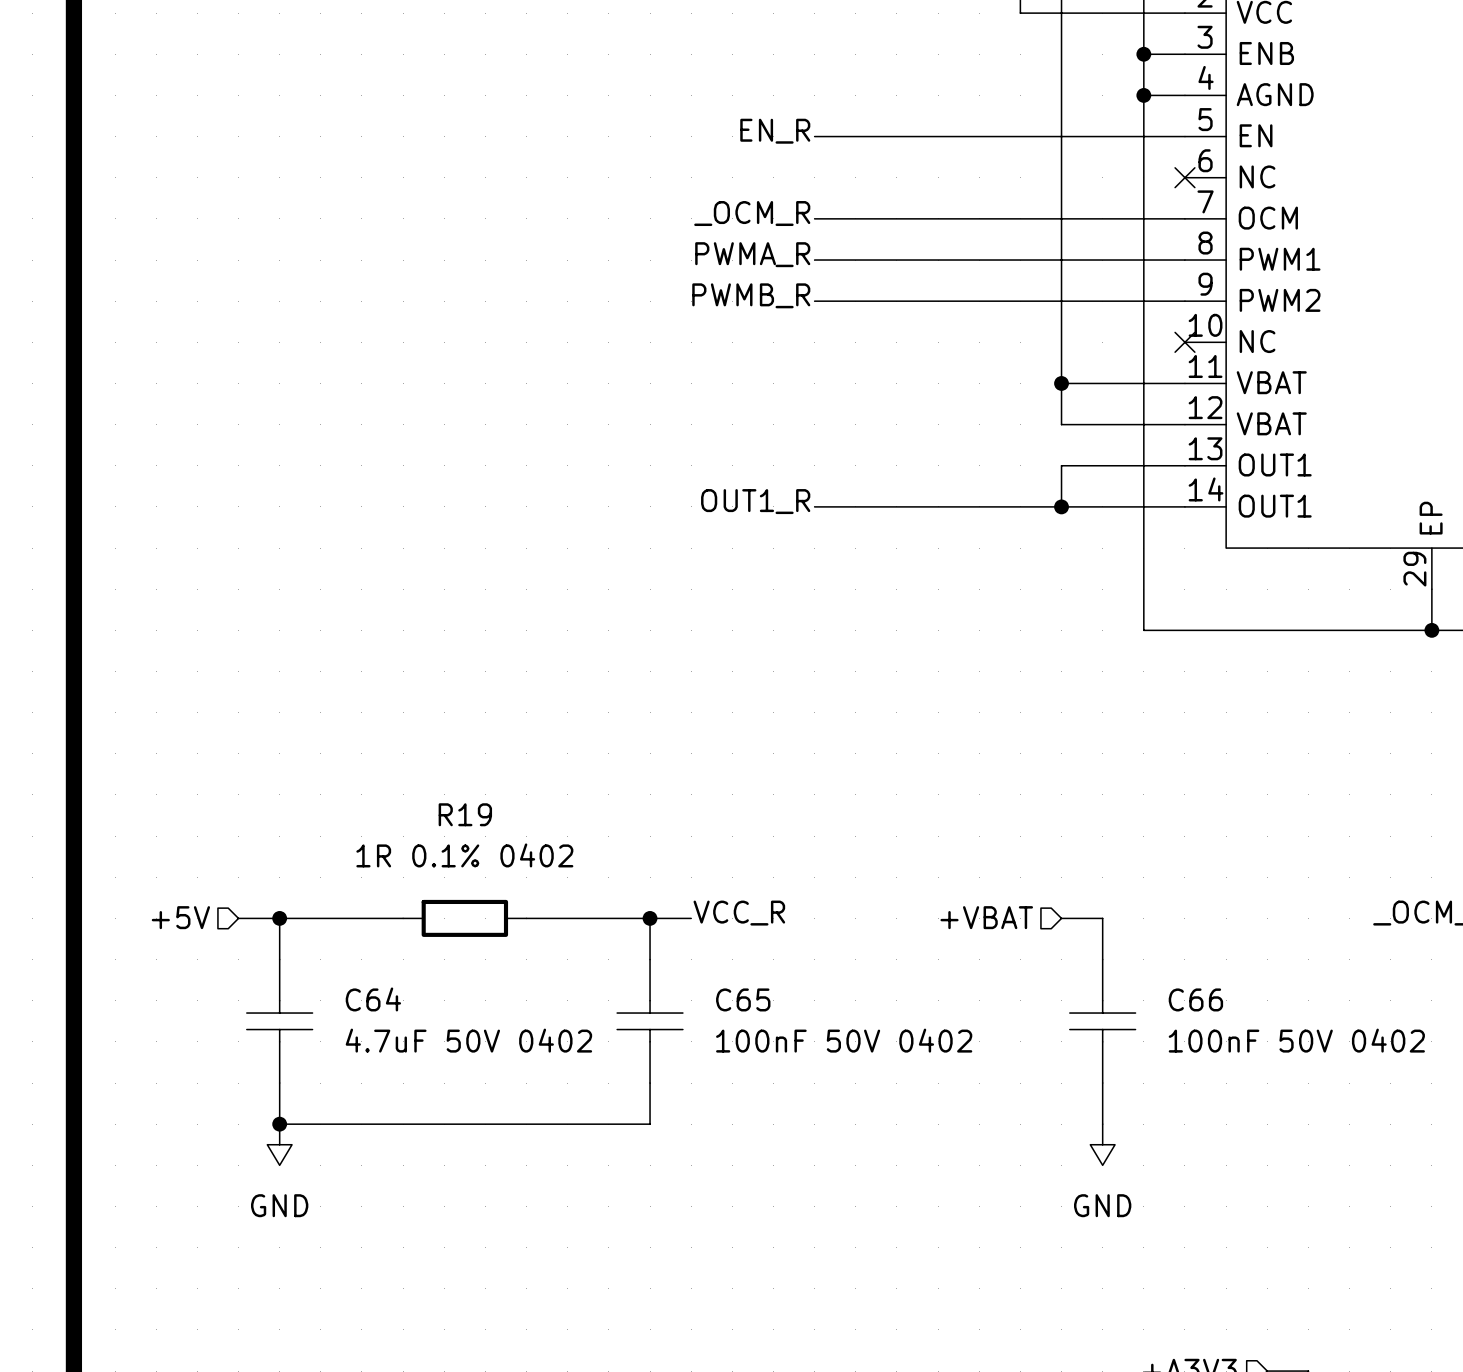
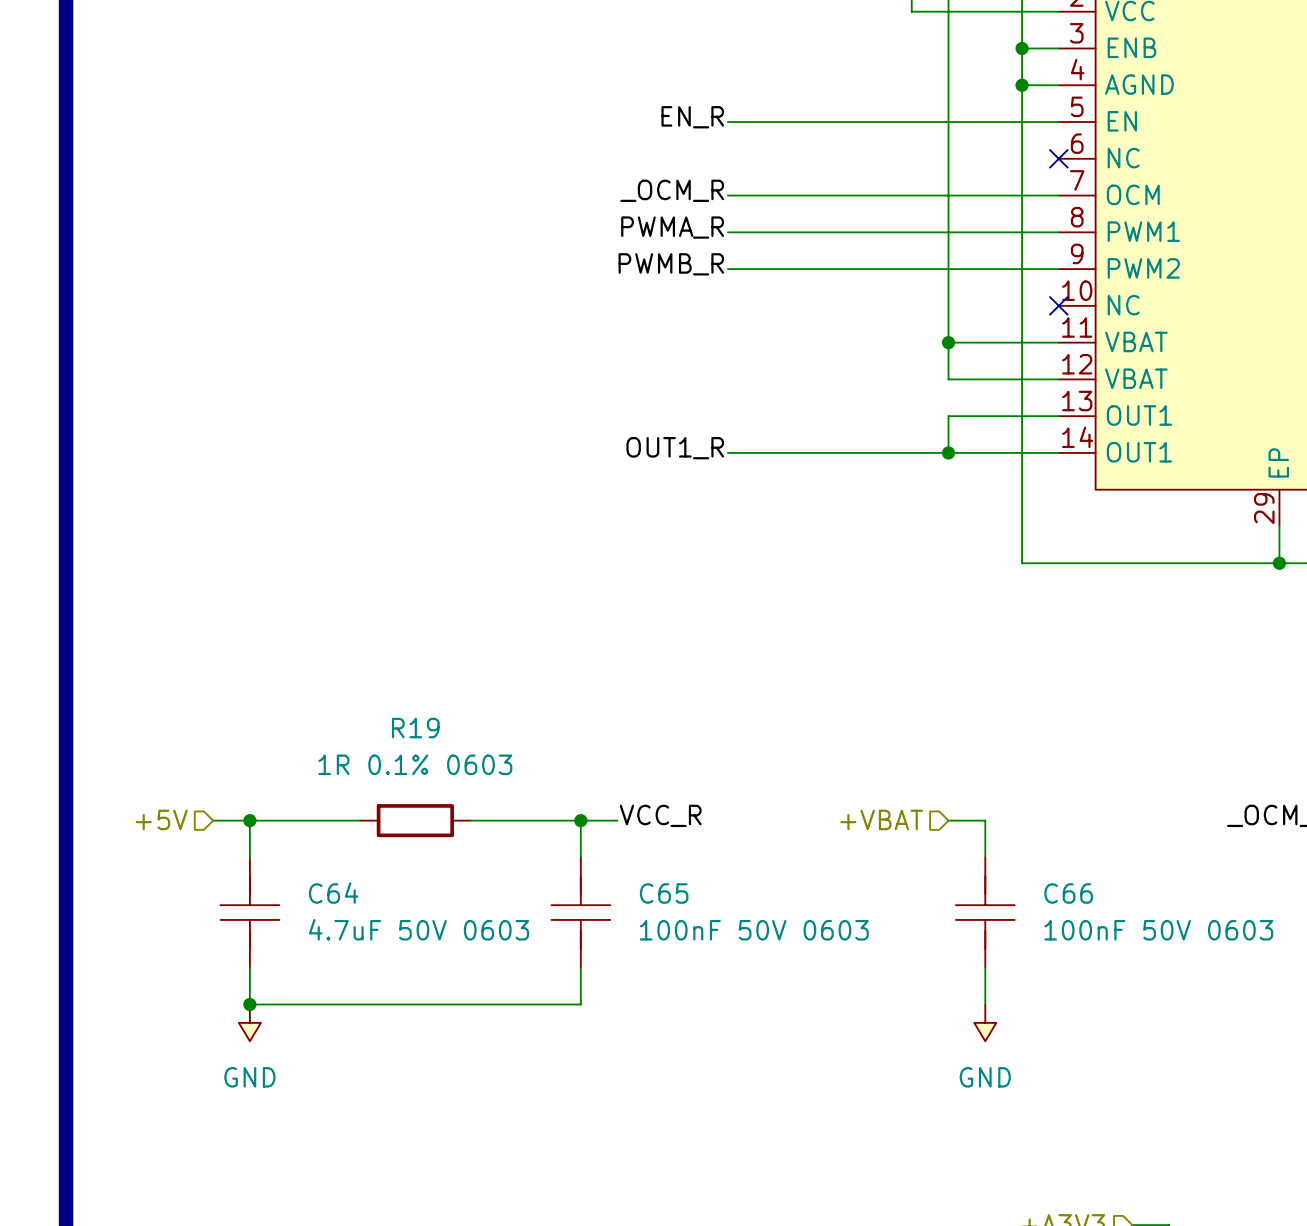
R19 value: 1R 0.1% 0402 (464, 855) -> 1R 0.1% 0603 (415, 764)
C64 symbol: [246, 959, 313, 1084] -> [220, 857, 280, 968]
C65 symbol: [617, 959, 683, 1084] -> [551, 857, 611, 968]
C66 symbol: [1069, 959, 1136, 1084] -> [955, 857, 1015, 968]
C64 value: 4.7uF 50V 0402 (468, 1040) -> 4.7uF 50V 0603 (419, 929)
C65 value: 100nF 50V 0402 (844, 1040) -> 100nF 50V 0603 (754, 930)
C66 value: 100nF 50V 0402 (1296, 1040) -> 100nF 50V 0603 (1158, 930)

